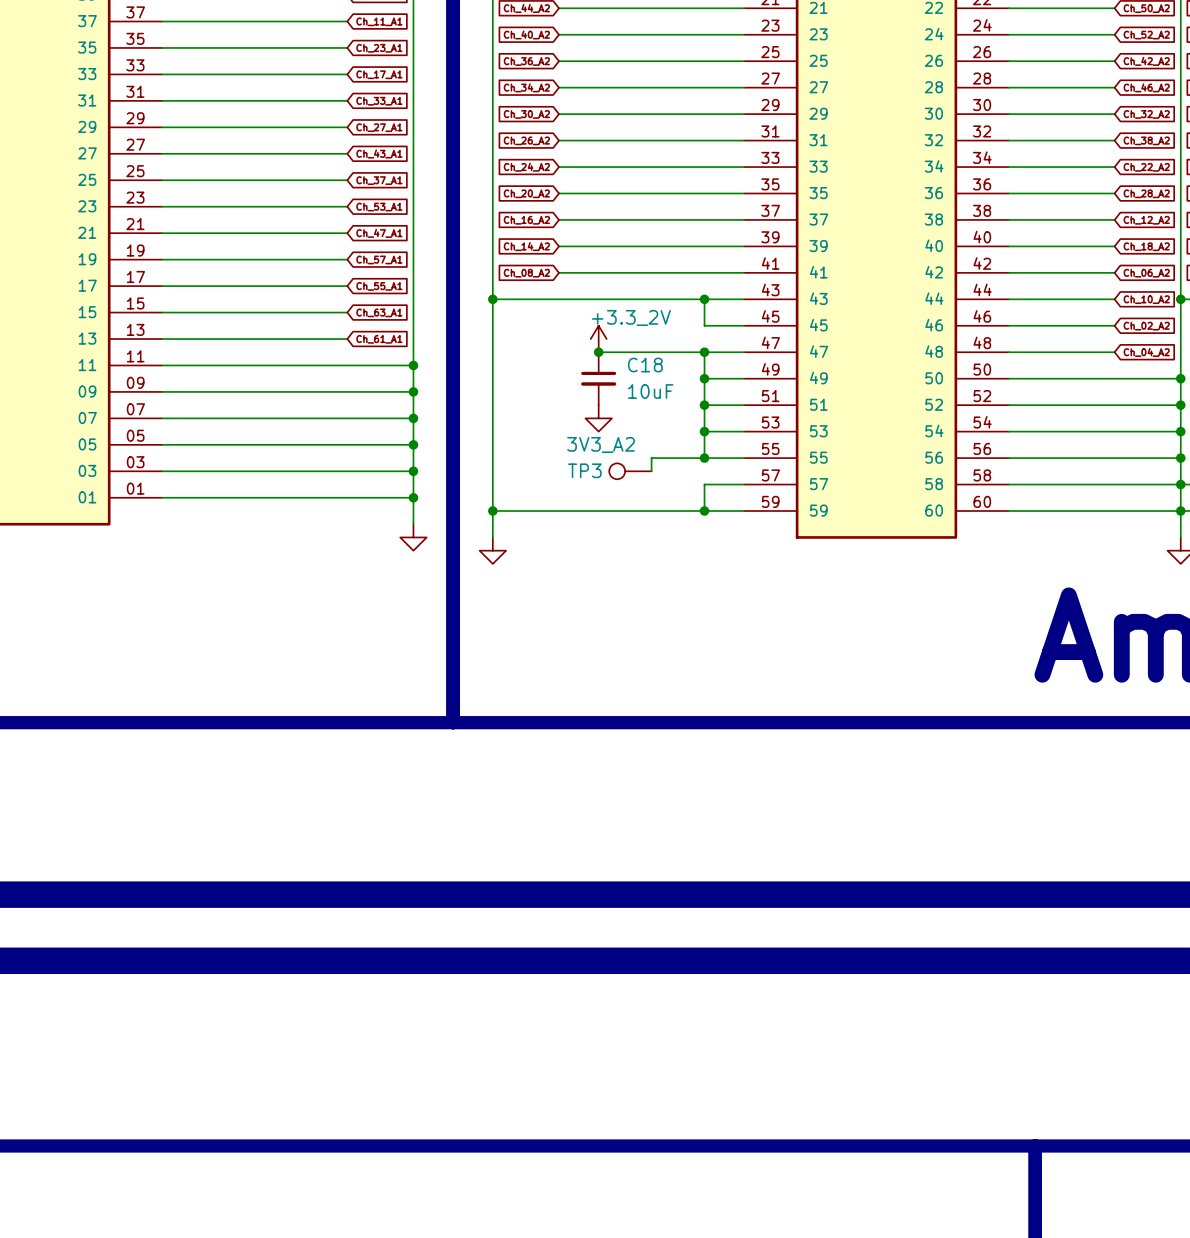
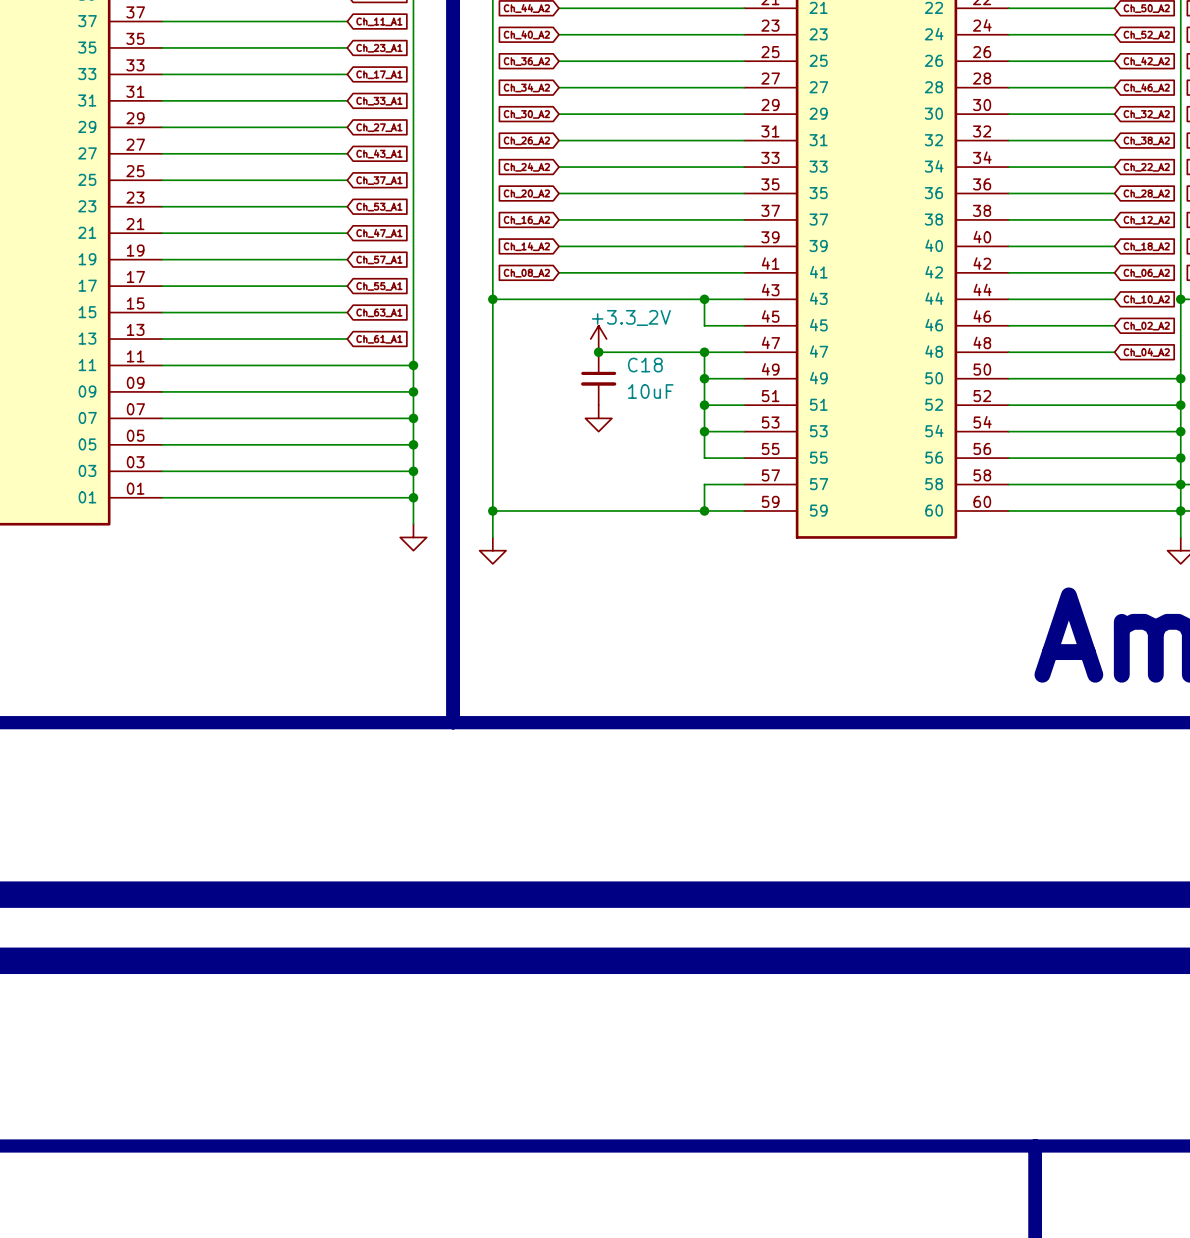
wire: (704, 458) (651, 458) (651, 471) -> none
junction: (704, 458) -> none
TP3: 3V3_A2 (630, 471) -> none

